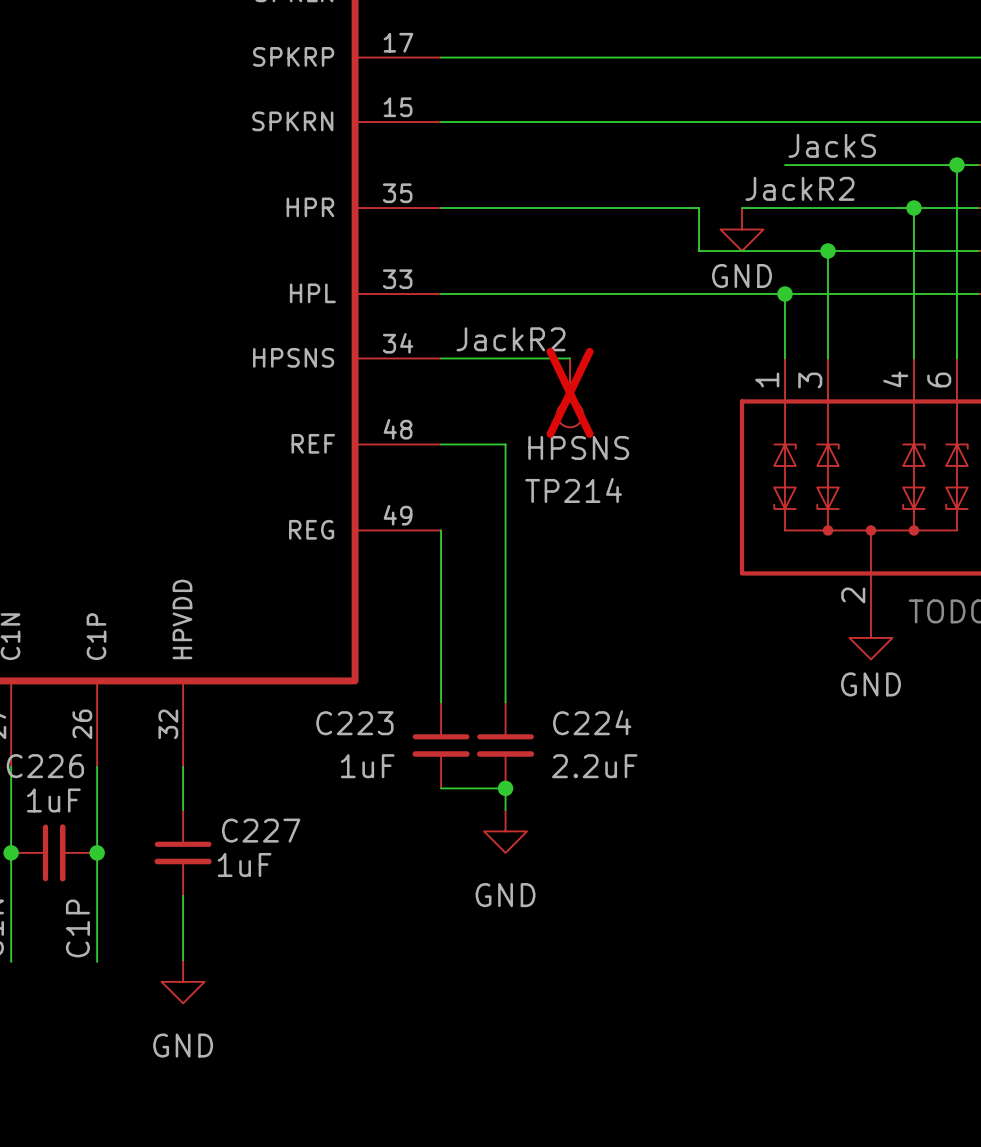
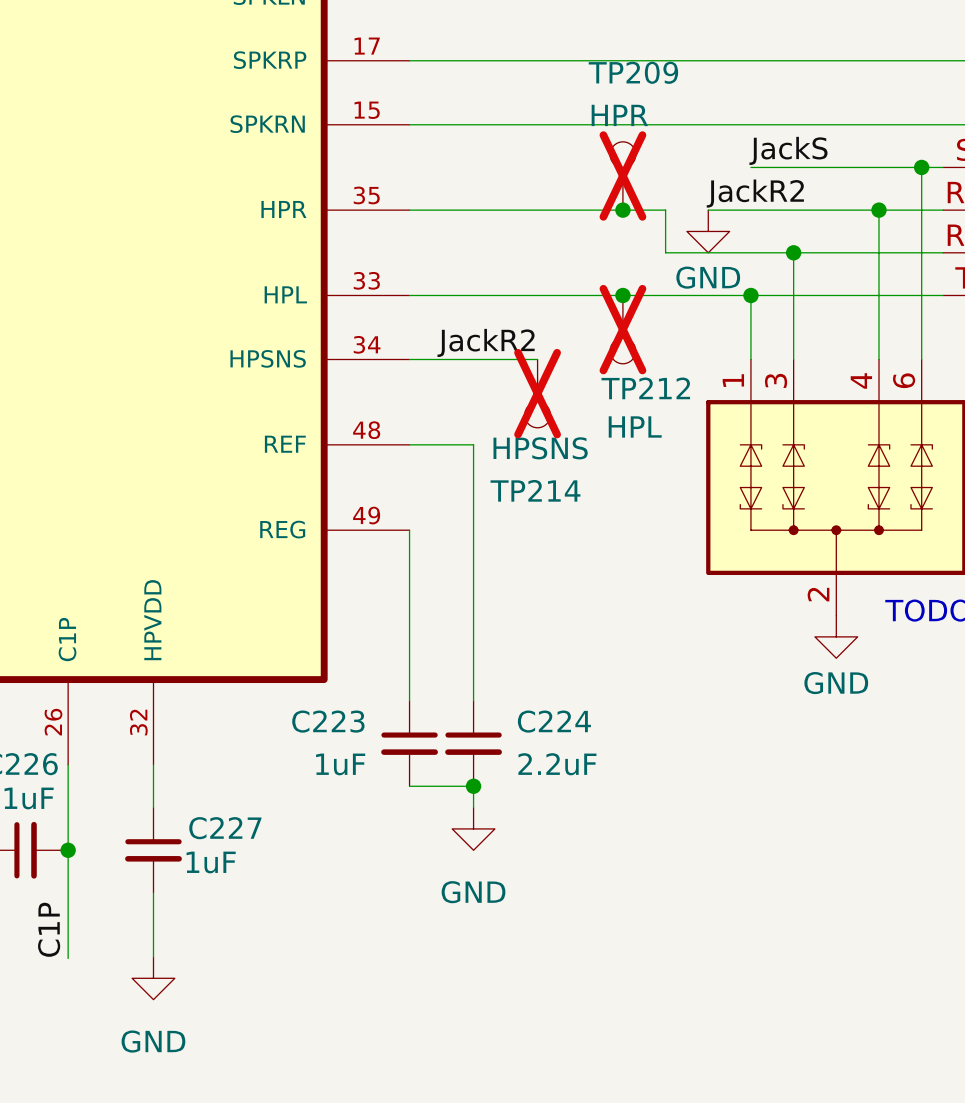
TP209: none -> HPR (622, 175)
junction: none -> (622, 210)
junction: none -> (622, 295)
TP212: none -> HPL (622, 329)

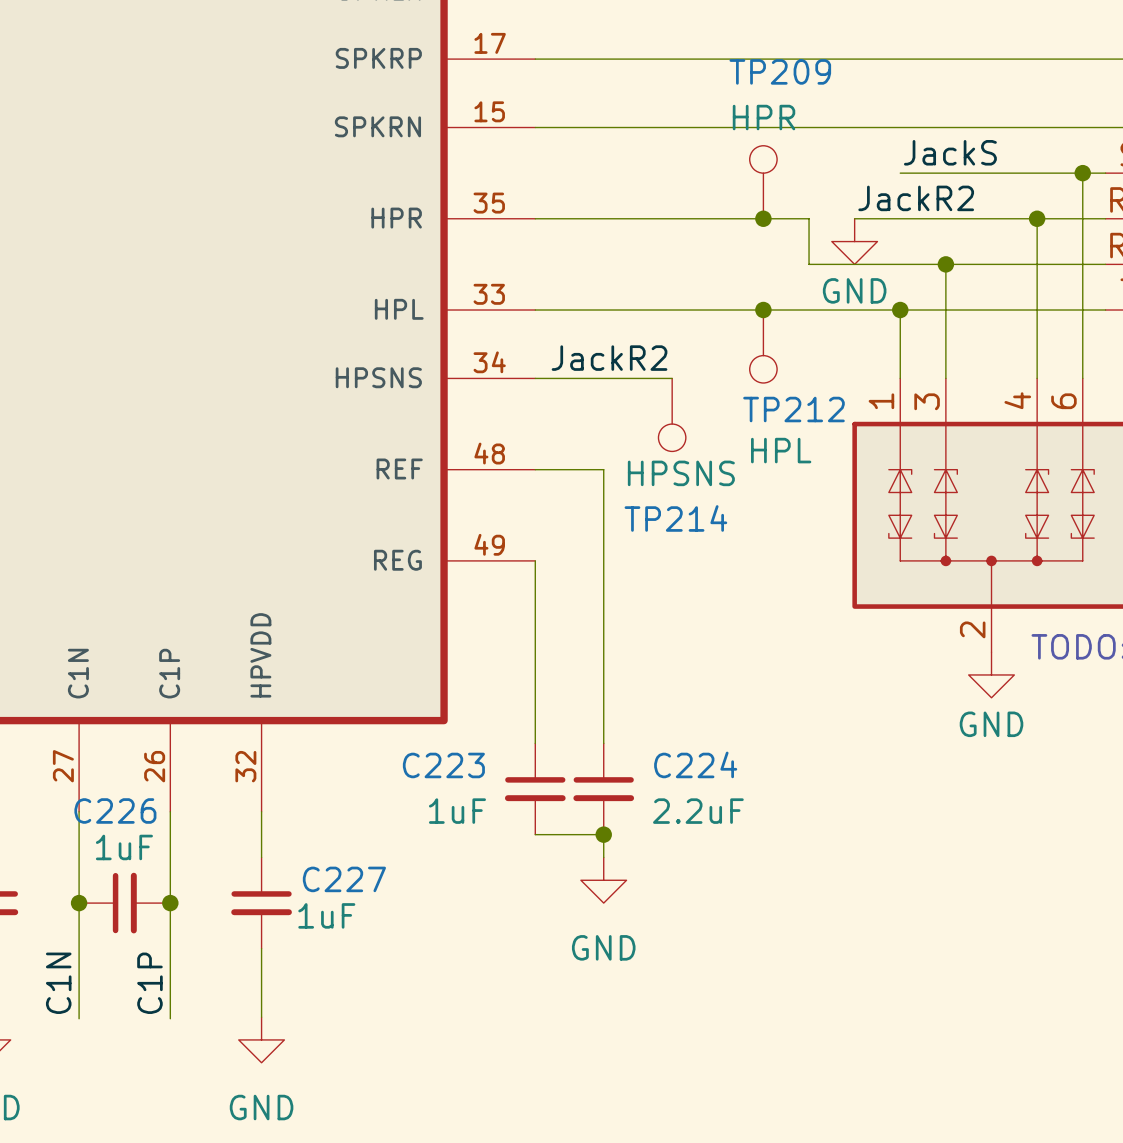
TP209 do-not-place cross: (622, 175) -> none
TP212 do-not-place cross: (622, 329) -> none
TP214 do-not-place cross: (537, 393) -> none

